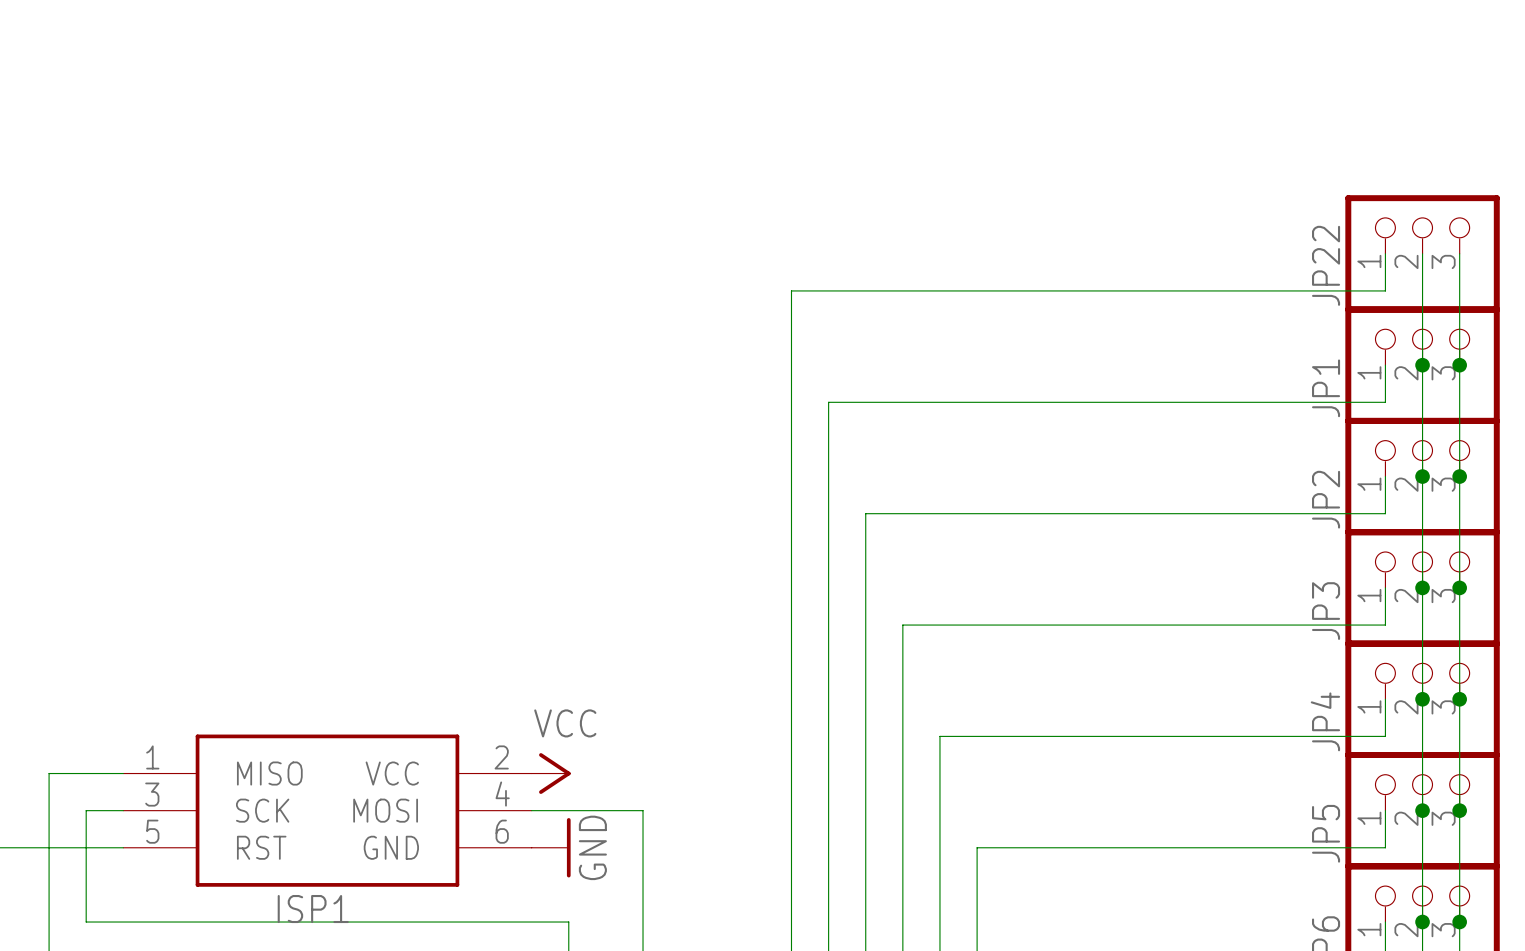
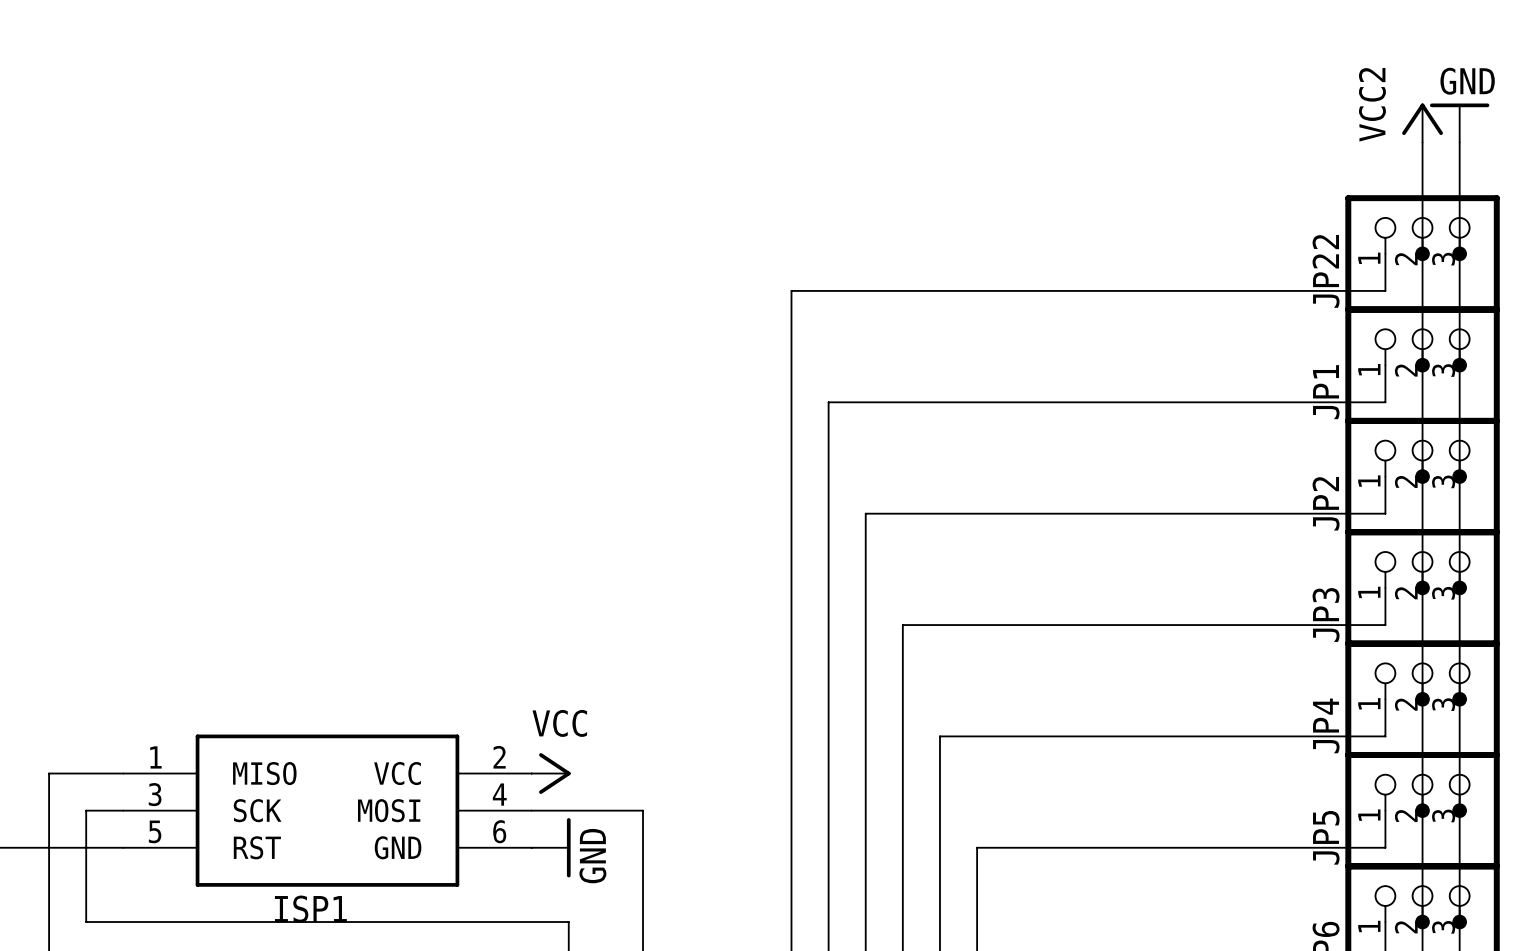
power symbol: none -> VCC2 (1422, 122)
power symbol: none -> GND (1459, 122)
wire: none -> (1422, 142) (1422, 253)
wire: none -> (1459, 142) (1459, 253)
junction: none -> (1422, 253)
junction: none -> (1459, 253)

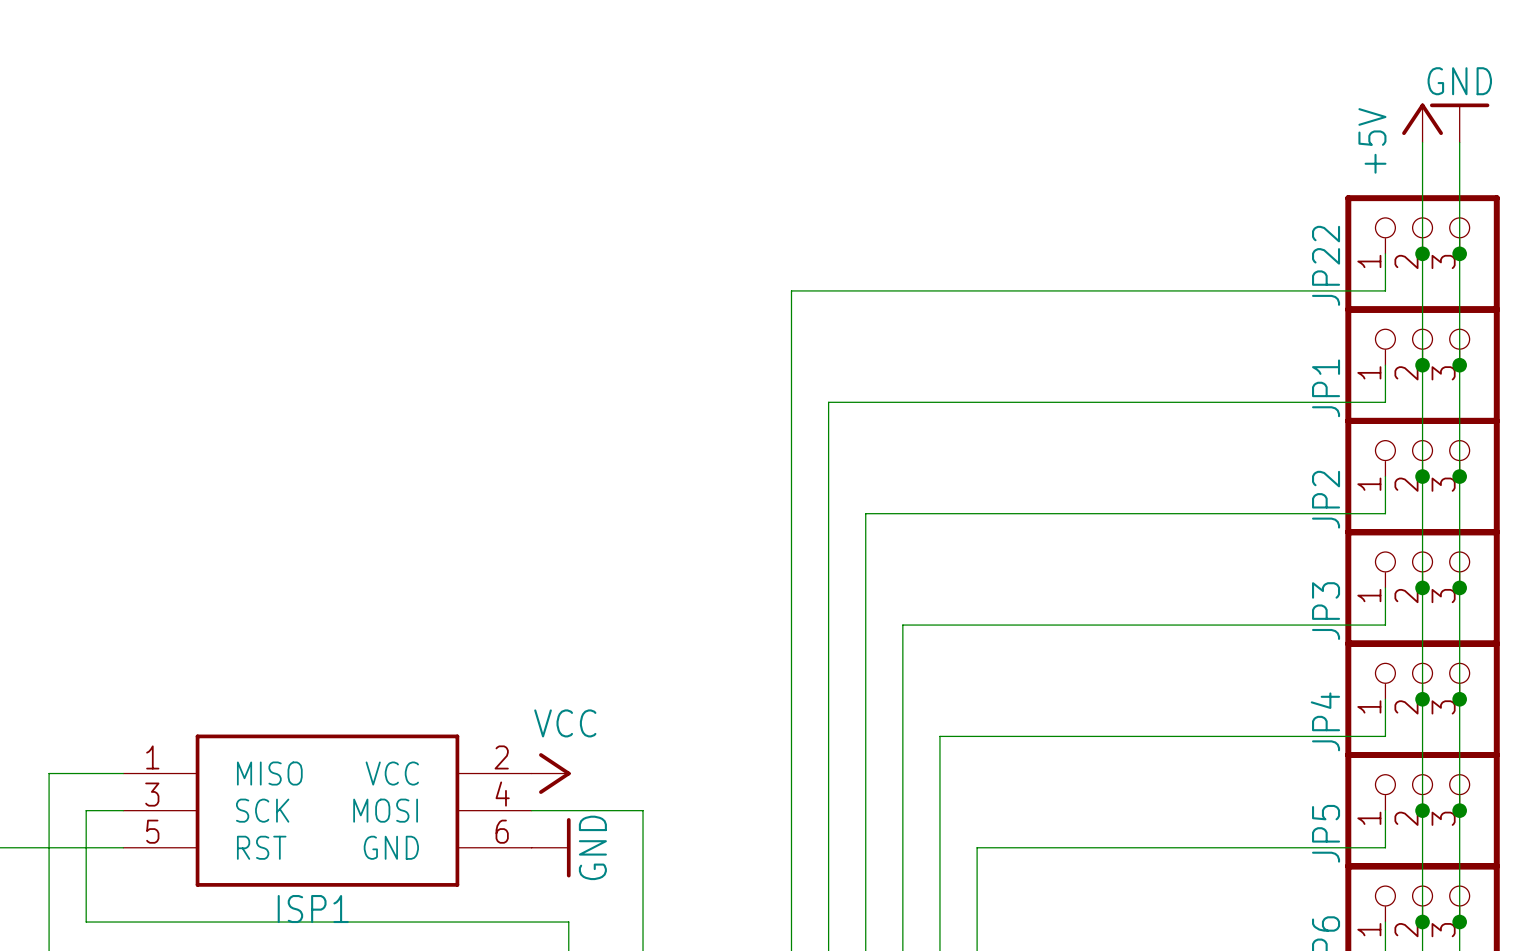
power symbol: VCC2 (1422, 122) -> +5V (1422, 122)

